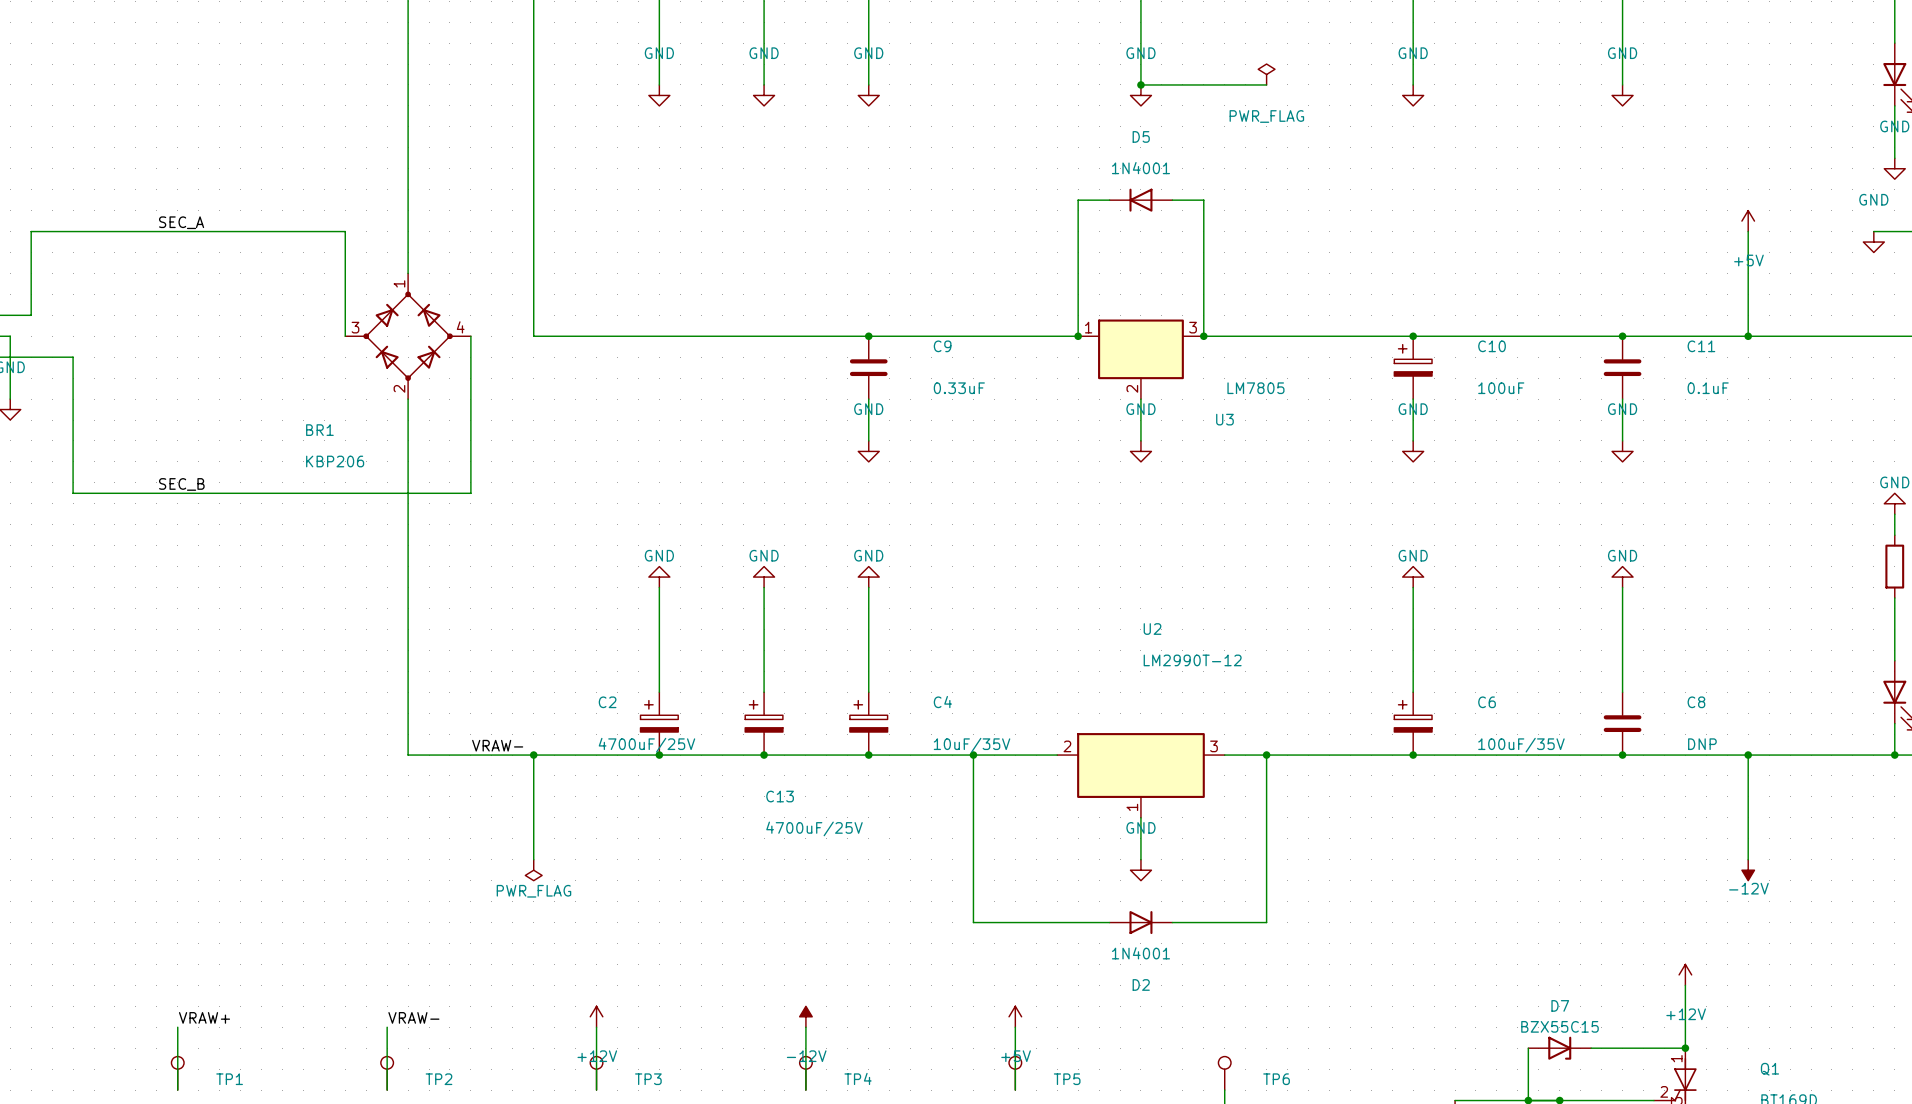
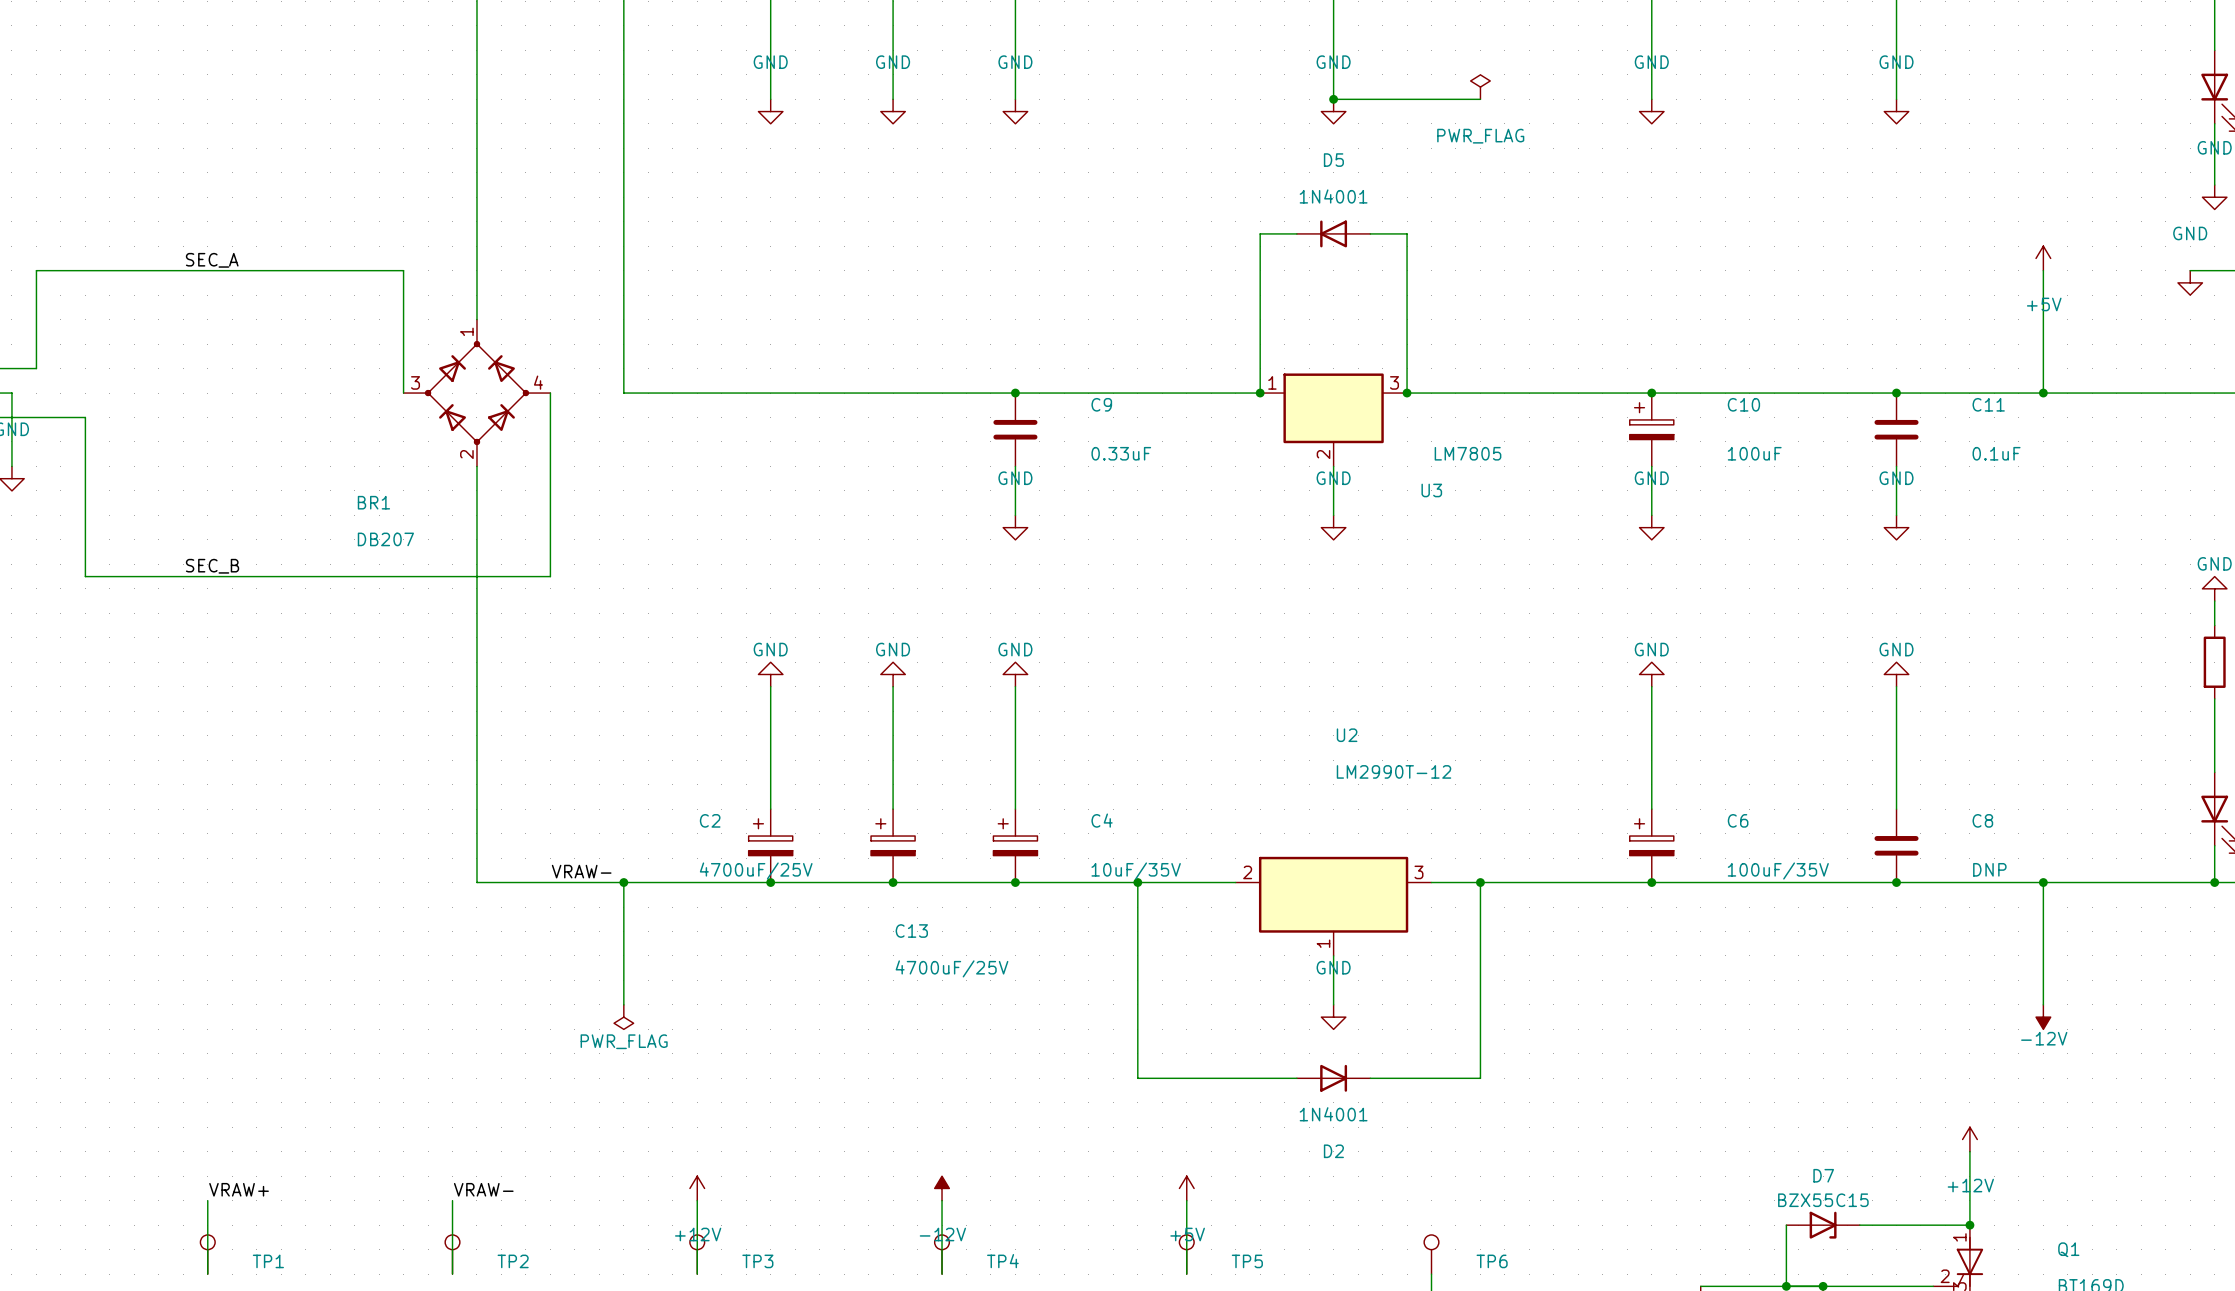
BR1 value: KBP206 (335, 461) -> DB207 (385, 539)

